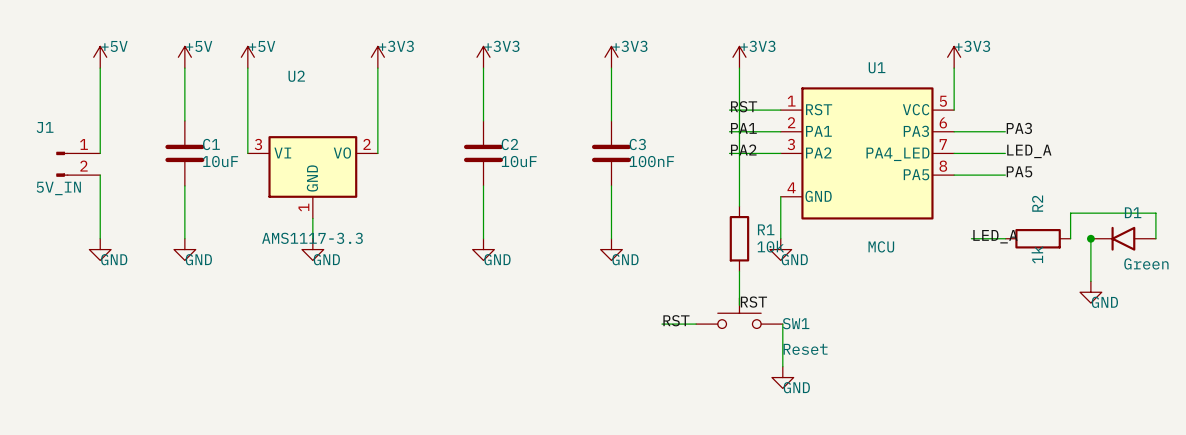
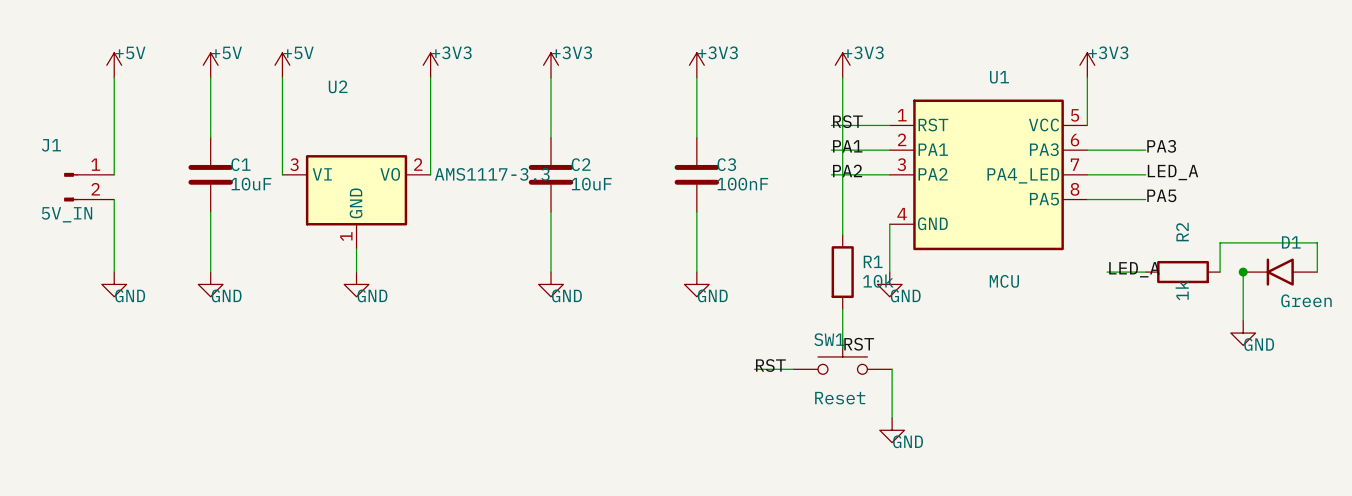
U2 value position: AMS1117-3.3 (312, 238) -> AMS1117-3.3 (492, 174)
SW1 name position: SW1 (796, 323) -> SW1 (829, 339)
SW1 value position: Reset (805, 349) -> Reset (840, 398)

